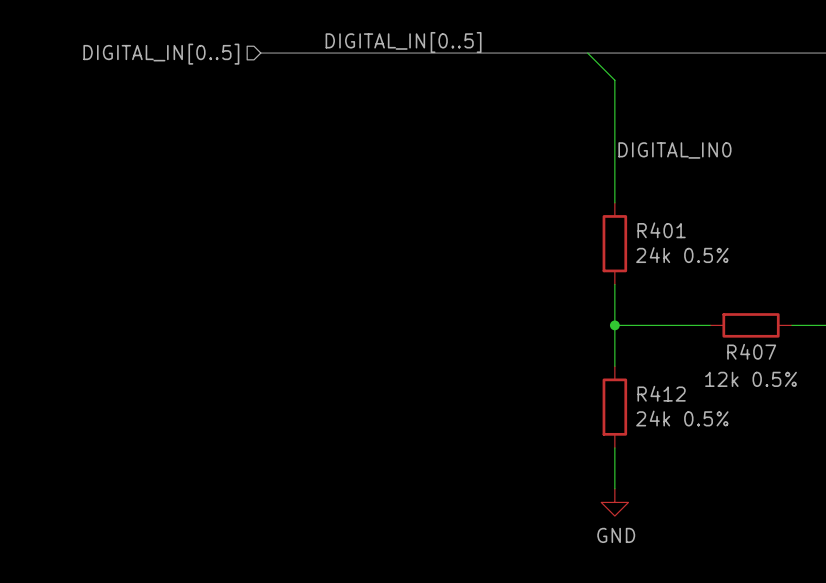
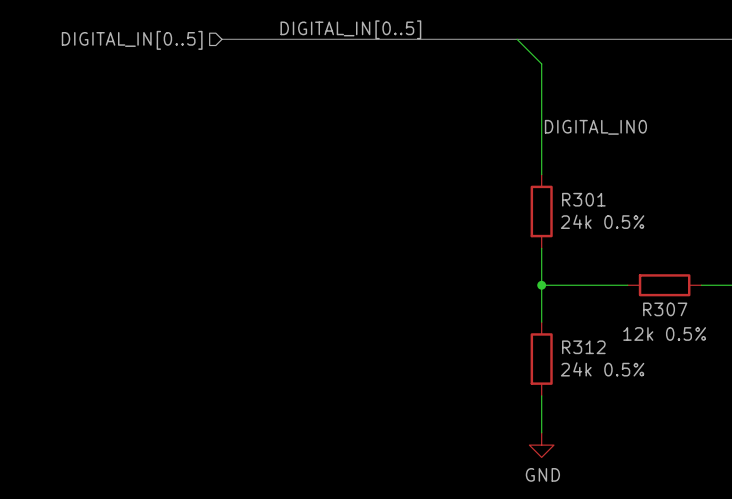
R401 name: R401 (661, 230) -> R301 (583, 199)
R407 name: R407 (751, 351) -> R307 (665, 309)
R412 name: R412 (661, 393) -> R312 (583, 347)

